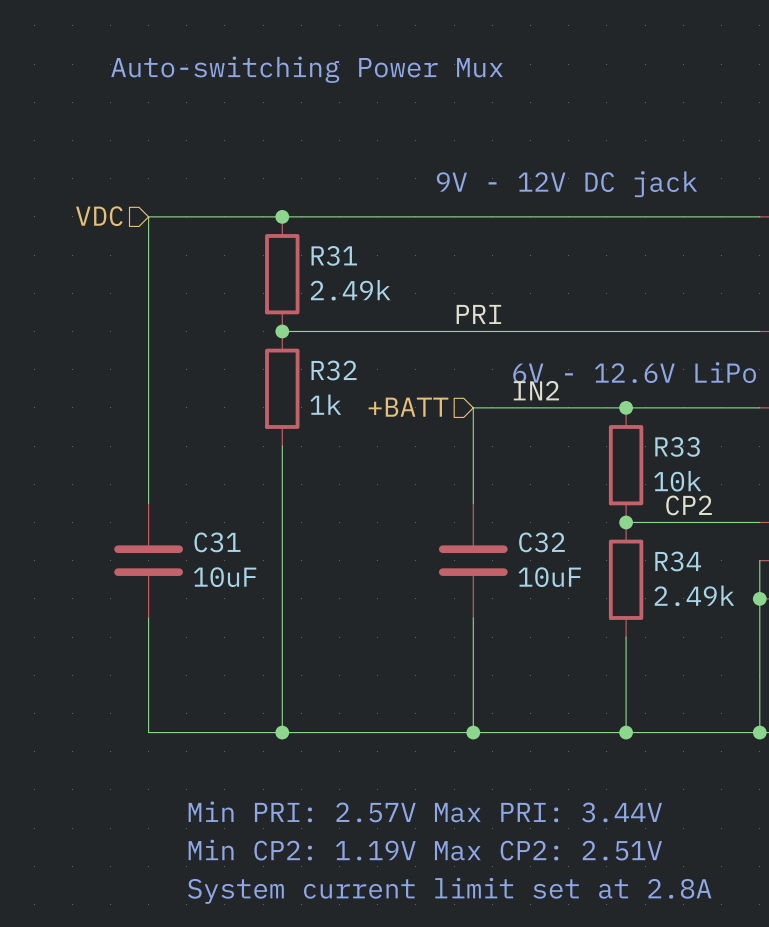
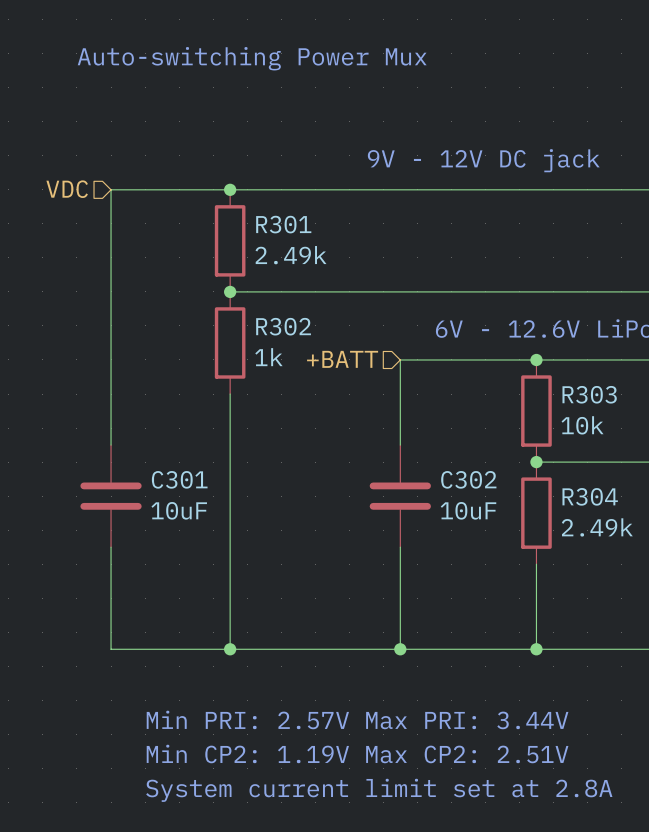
R31 name: R31 (334, 255) -> R301 (283, 224)
label: PRI (478, 314) -> none
R32 name: R32 (334, 370) -> R302 (283, 326)
label: IN2 (536, 390) -> none
R33 name: R33 (677, 446) -> R303 (589, 394)
label: CP2 (689, 505) -> none
C31 name: C31 (217, 542) -> C301 (179, 479)
C32 name: C32 (541, 542) -> C302 (468, 479)
R34 name: R34 (678, 561) -> R304 (590, 496)

